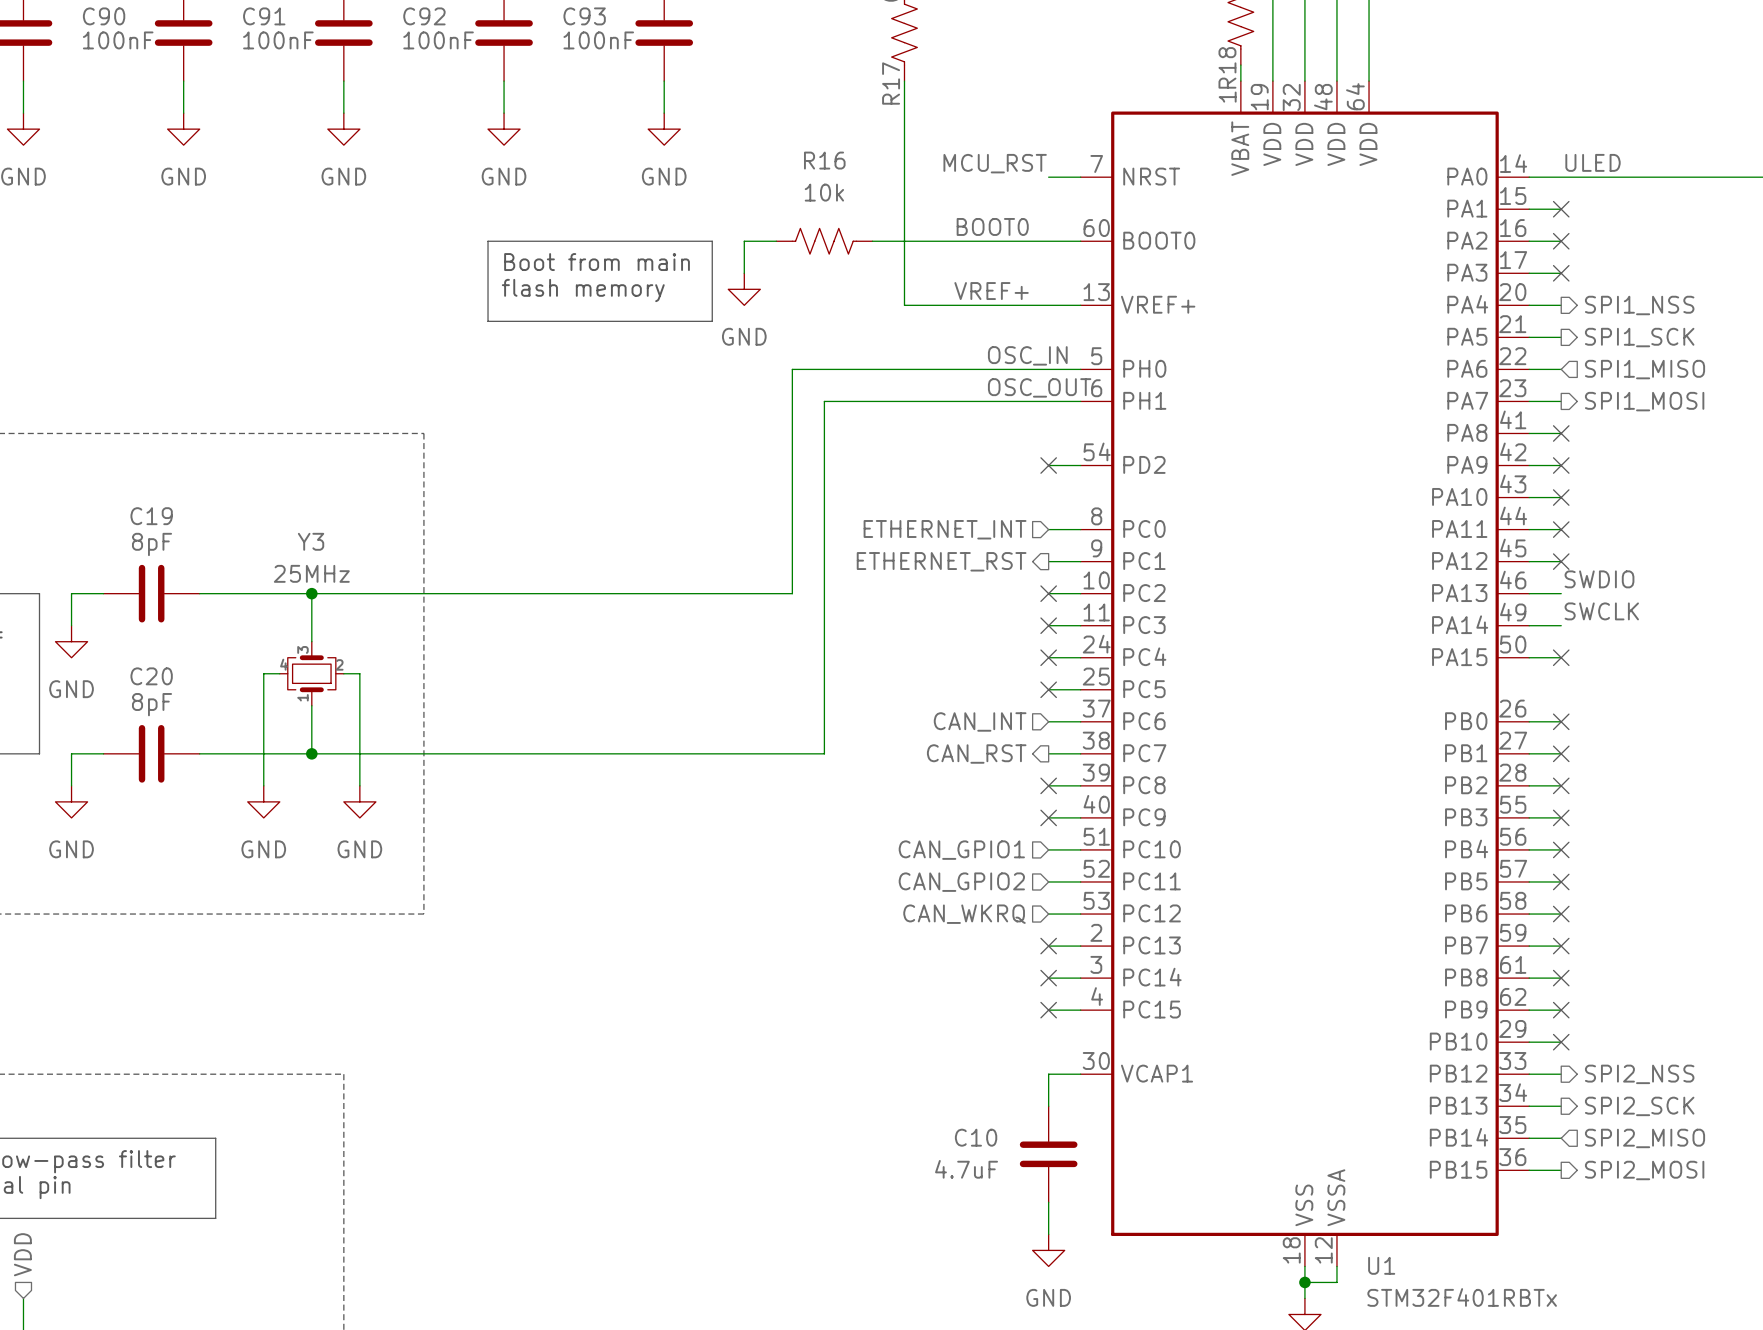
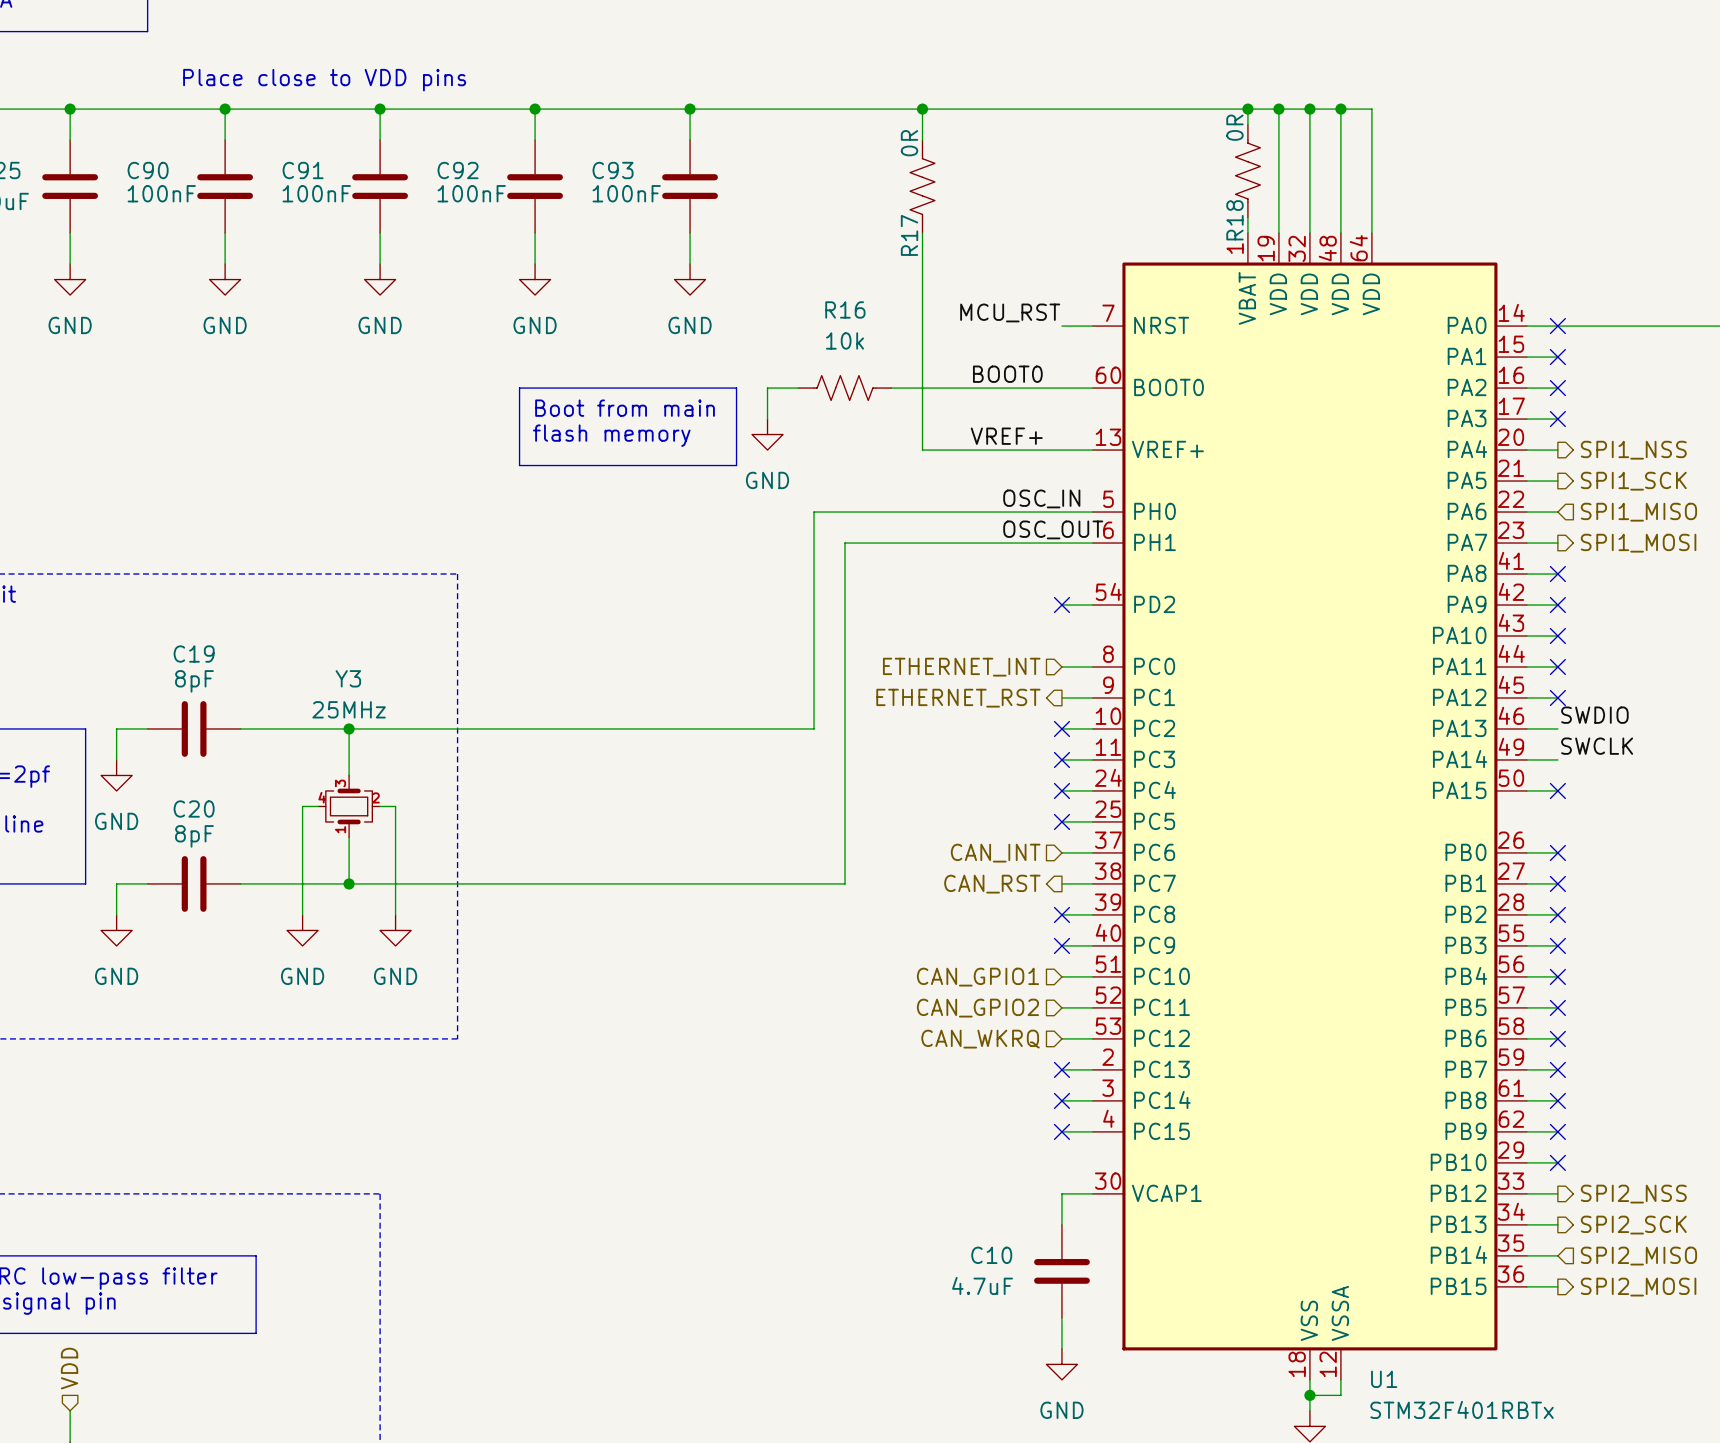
label: ULED (1593, 162) -> none
no-connect mark: none -> (1557, 326)

